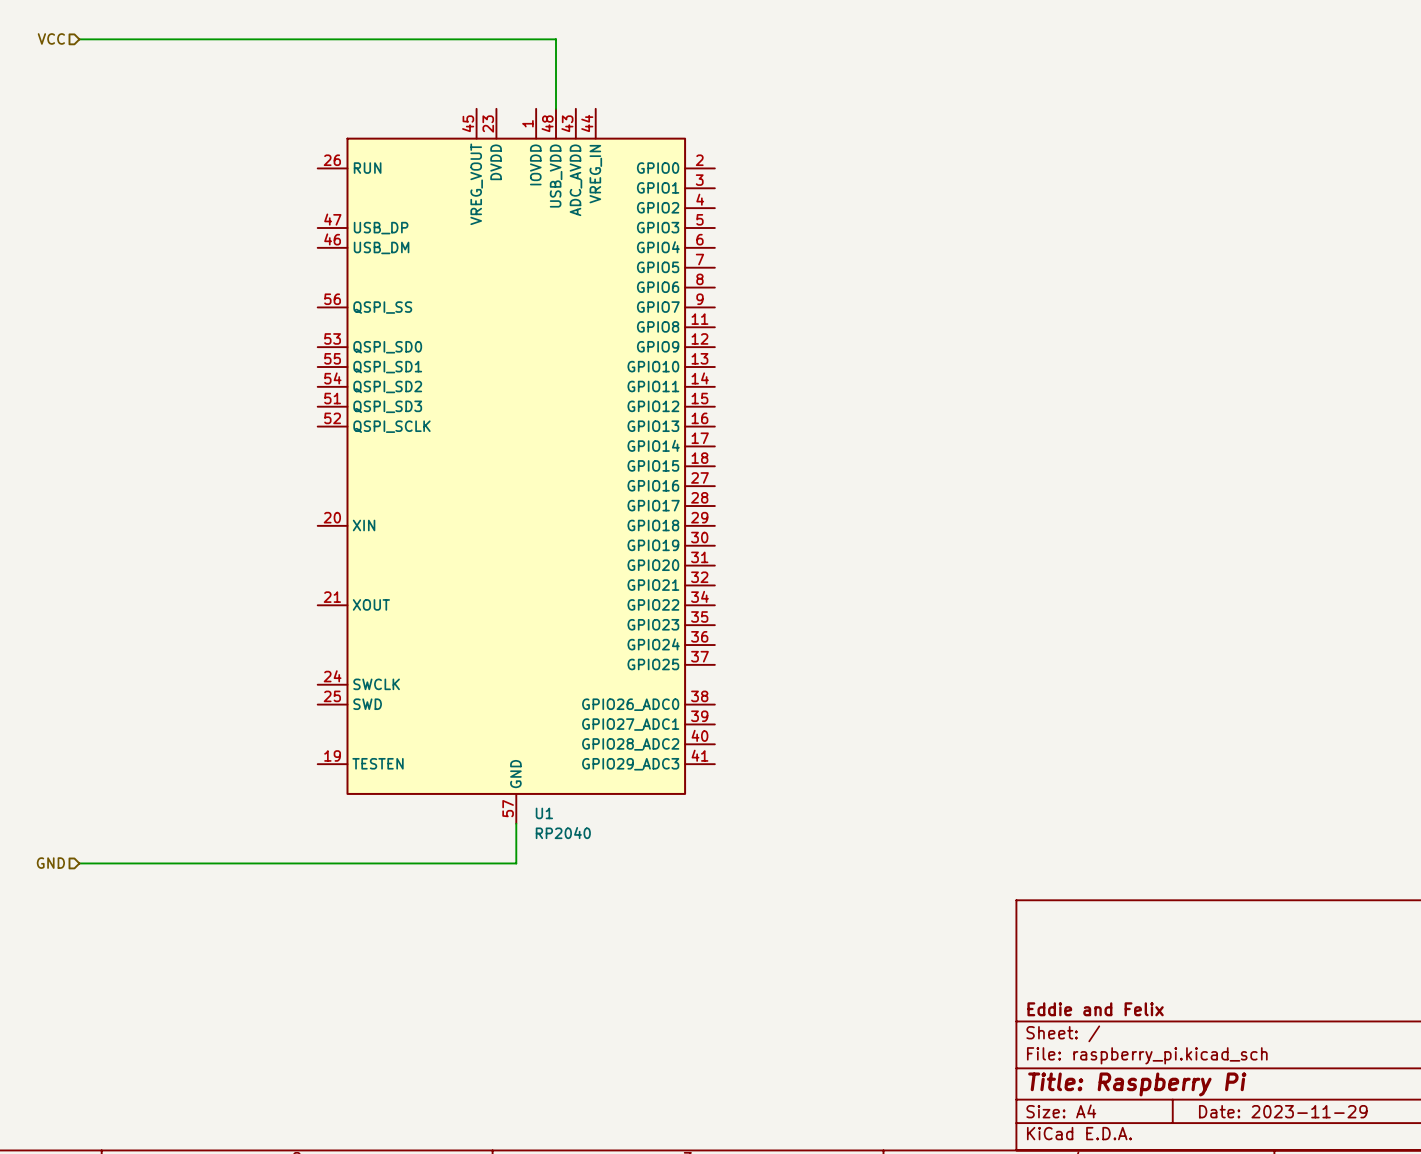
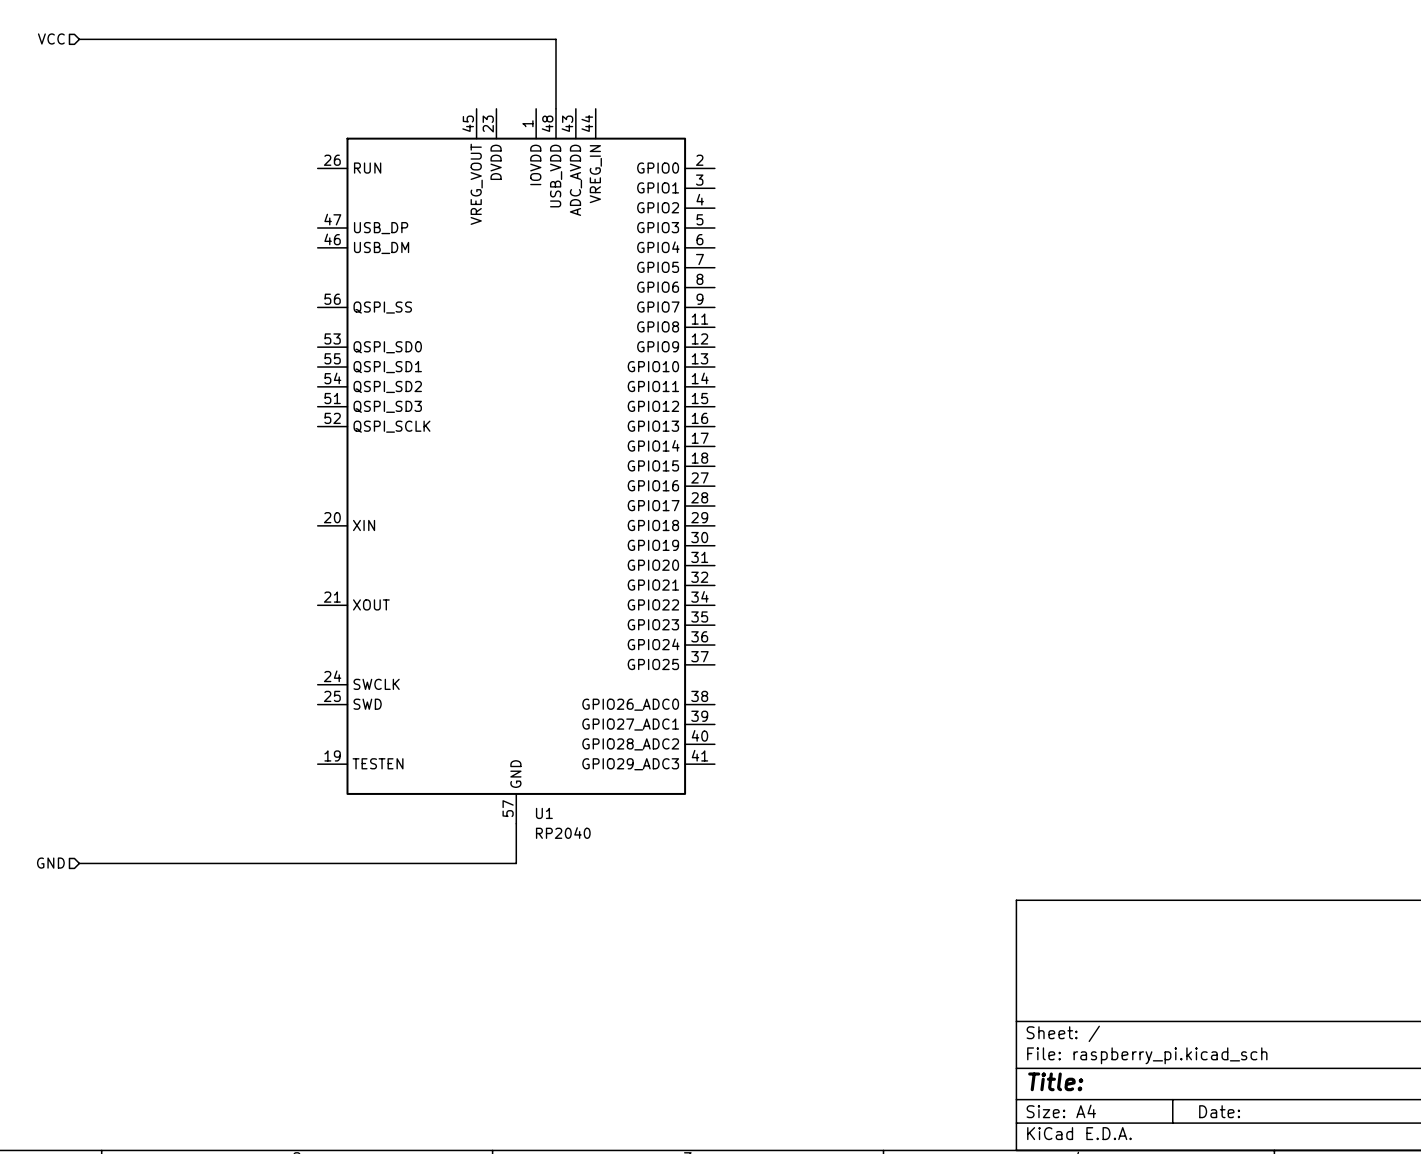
title block: Eddie and Felix (1095, 1009) -> none
title block: Title: Raspberry Pi (1137, 1084) -> Title: (1055, 1081)
title block: Date: 2023-11-29 (1283, 1111) -> Date: (1219, 1111)

